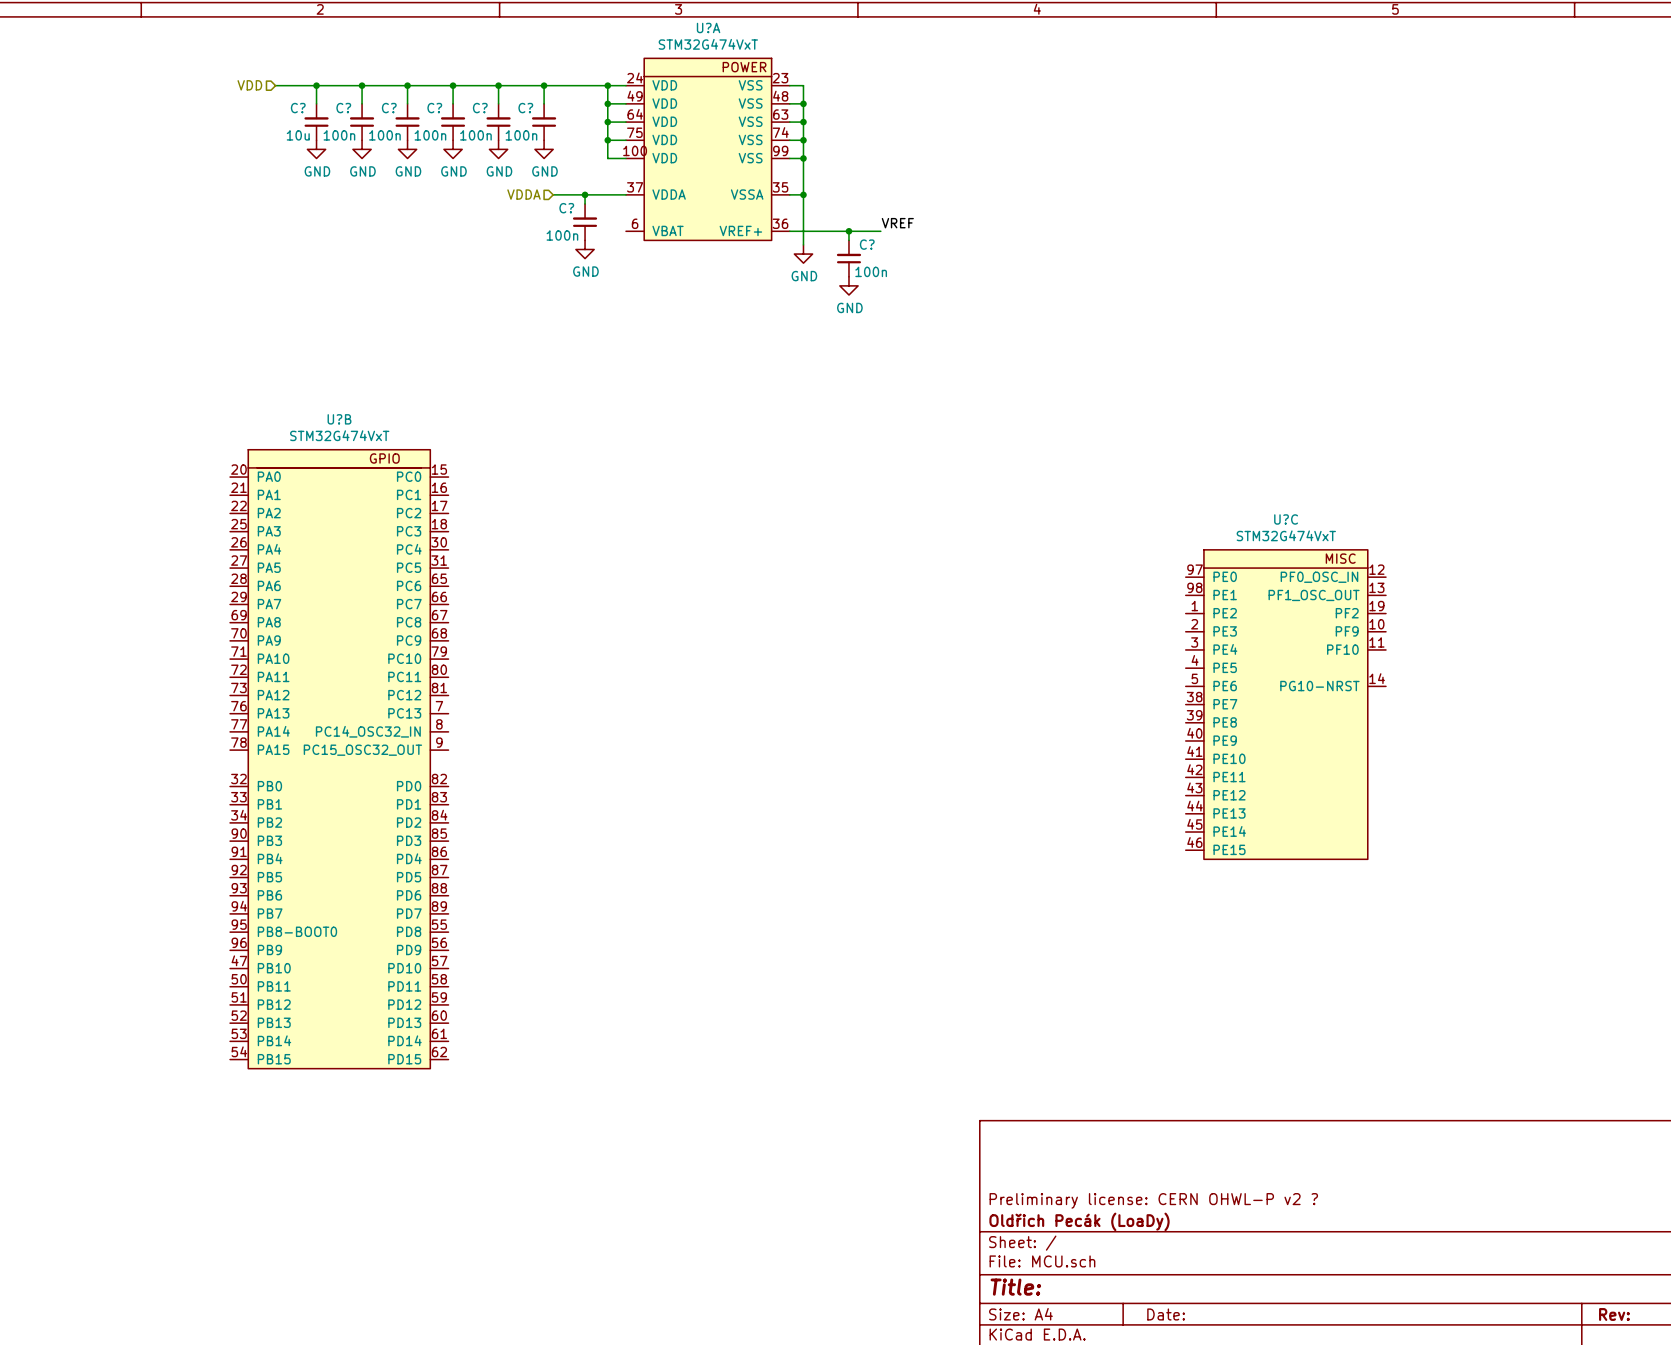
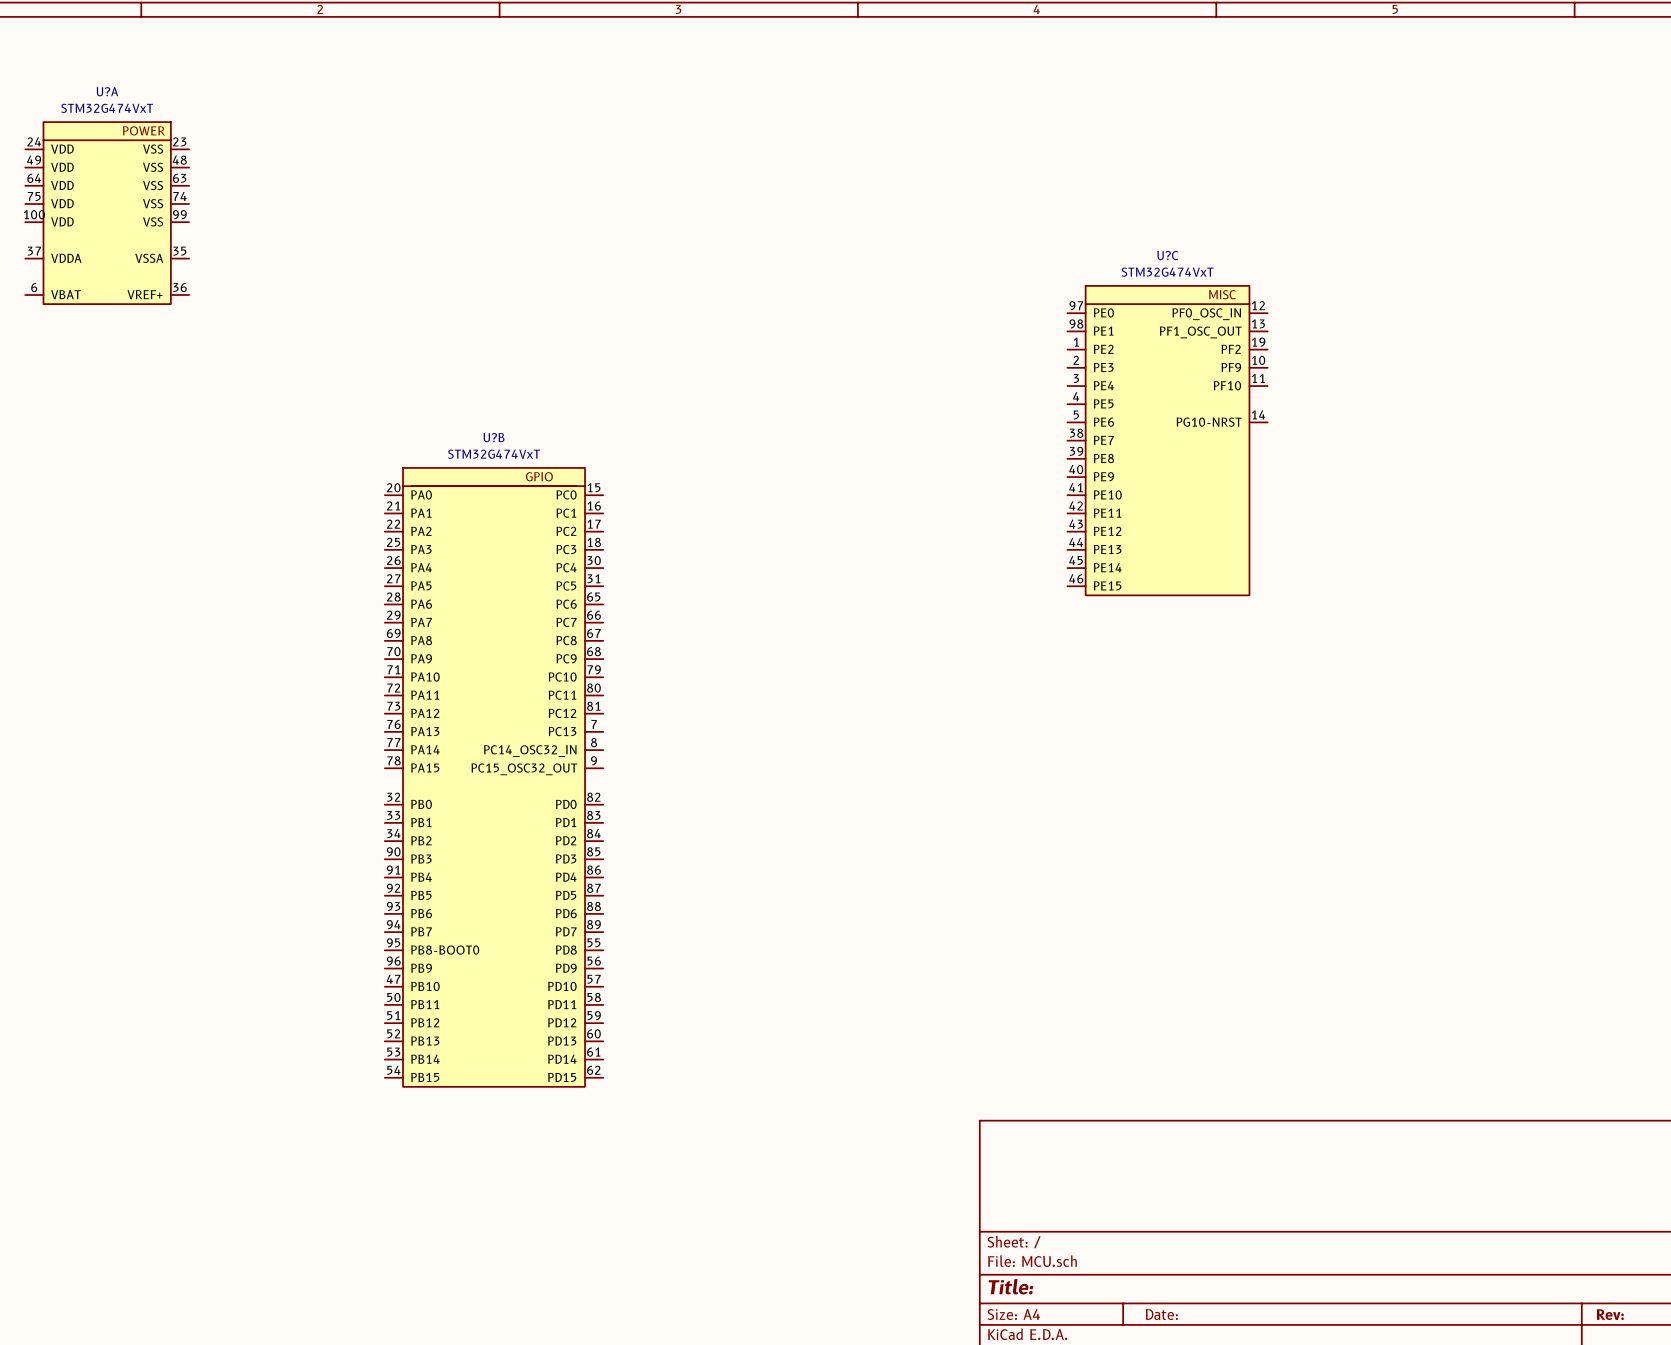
hierarchical label: VDD (249, 85) -> none
wire: (275, 85) (625, 85) -> none
wire: (316, 85) (316, 103) -> none
junction: (316, 85) -> none
wire: (362, 85) (362, 103) -> none
junction: (362, 85) -> none
wire: (407, 85) (407, 103) -> none
junction: (407, 85) -> none
wire: (453, 85) (453, 103) -> none
junction: (453, 85) -> none
wire: (498, 85) (498, 103) -> none
junction: (498, 85) -> none
wire: (544, 85) (544, 103) -> none
junction: (544, 85) -> none
wire: (607, 85) (607, 158) (625, 158) -> none
junction: (607, 85) -> none
wire: (789, 85) (803, 85) (803, 244) -> none
wire: (607, 103) (625, 103) -> none
junction: (607, 103) -> none
wire: (789, 103) (803, 103) -> none
junction: (803, 103) -> none
C?: 10u (316, 122) -> none
C?: 100n (362, 122) -> none
C?: 100n (407, 122) -> none
C?: 100n (453, 122) -> none
C?: 100n (498, 122) -> none
C?: 100n (544, 122) -> none
wire: (607, 122) (625, 122) -> none
junction: (607, 122) -> none
wire: (789, 122) (803, 122) -> none
junction: (803, 122) -> none
wire: (607, 140) (625, 140) -> none
junction: (607, 140) -> none
wire: (789, 140) (803, 140) -> none
junction: (803, 140) -> none
power symbol: GND (316, 149) -> none
power symbol: GND (362, 149) -> none
power symbol: GND (407, 149) -> none
power symbol: GND (453, 149) -> none
power symbol: GND (498, 149) -> none
power symbol: GND (544, 149) -> none
U?A: STM32G474VxT (707, 149) -> none
wire: (789, 158) (803, 158) -> none
junction: (803, 158) -> none
hierarchical label: VDDA (523, 194) -> none
wire: (553, 194) (625, 194) -> none
wire: (585, 194) (585, 203) -> none
junction: (585, 194) -> none
wire: (789, 194) (803, 194) -> none
junction: (803, 194) -> none
U?A: none -> STM32G474VxT (107, 213)
C?: 100n (585, 222) -> none
label: VREF (897, 223) -> none
wire: (789, 231) (880, 231) -> none
wire: (848, 231) (848, 240) -> none
junction: (848, 231) -> none
power symbol: GND (585, 249) -> none
power symbol: GND (803, 254) -> none
C?: 100n (848, 258) -> none
power symbol: GND (848, 285) -> none
U?C: none -> STM32G474VxT (1167, 440)
U?C: STM32G474VxT (1285, 704) -> none
U?B position: (339, 759) -> (494, 777)
title block: Preliminary license: CERN OHWL-P v2 ? (1153, 1200) -> none
title block: Oldřich Pecák (LoaDy) (1079, 1221) -> none

